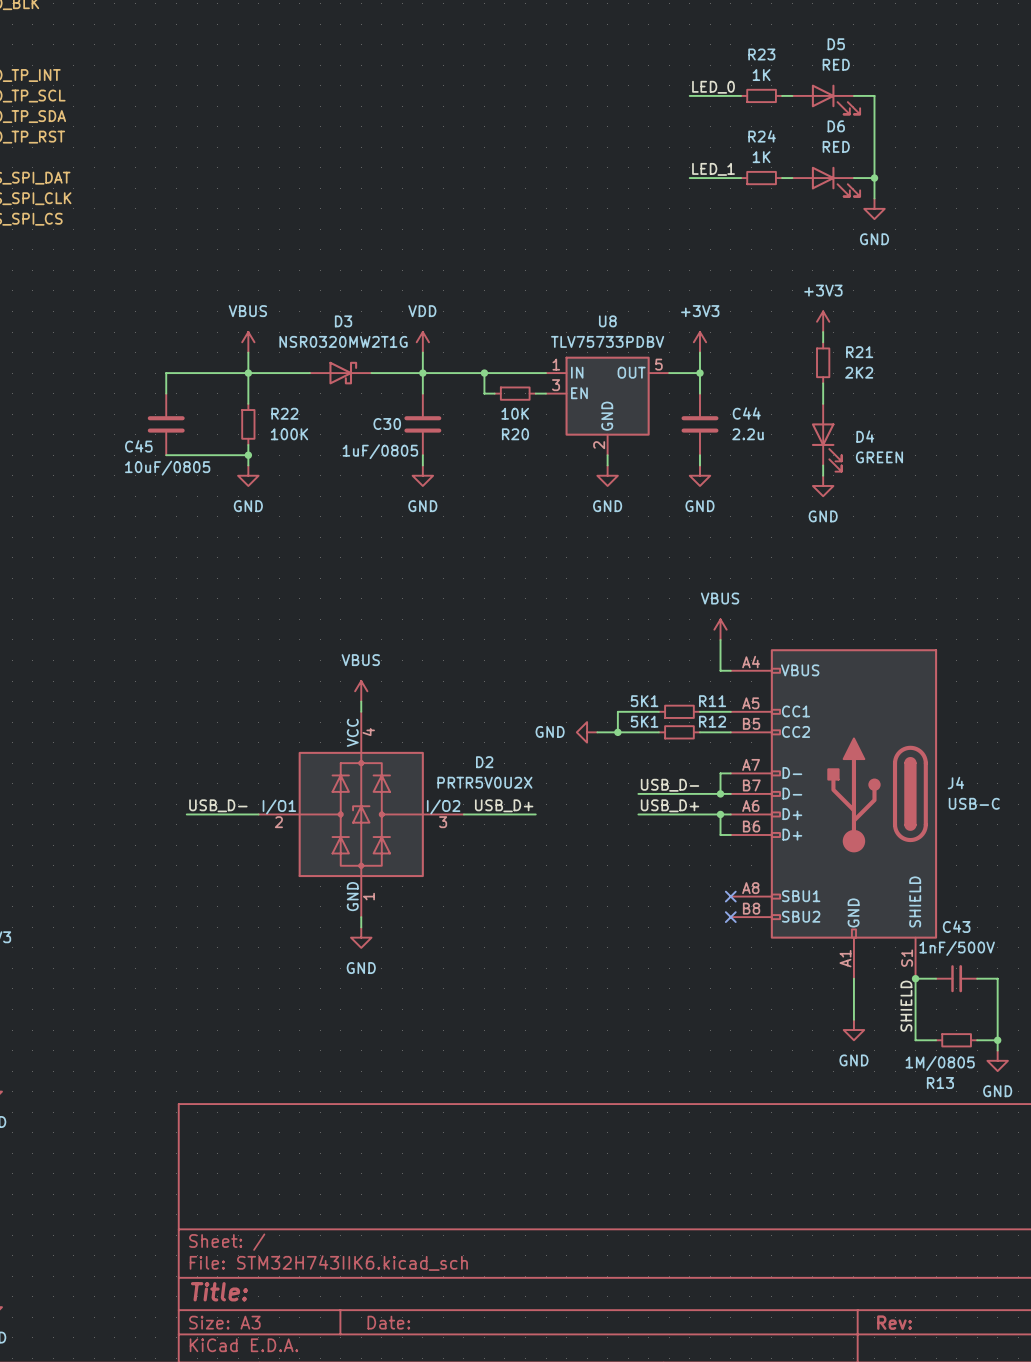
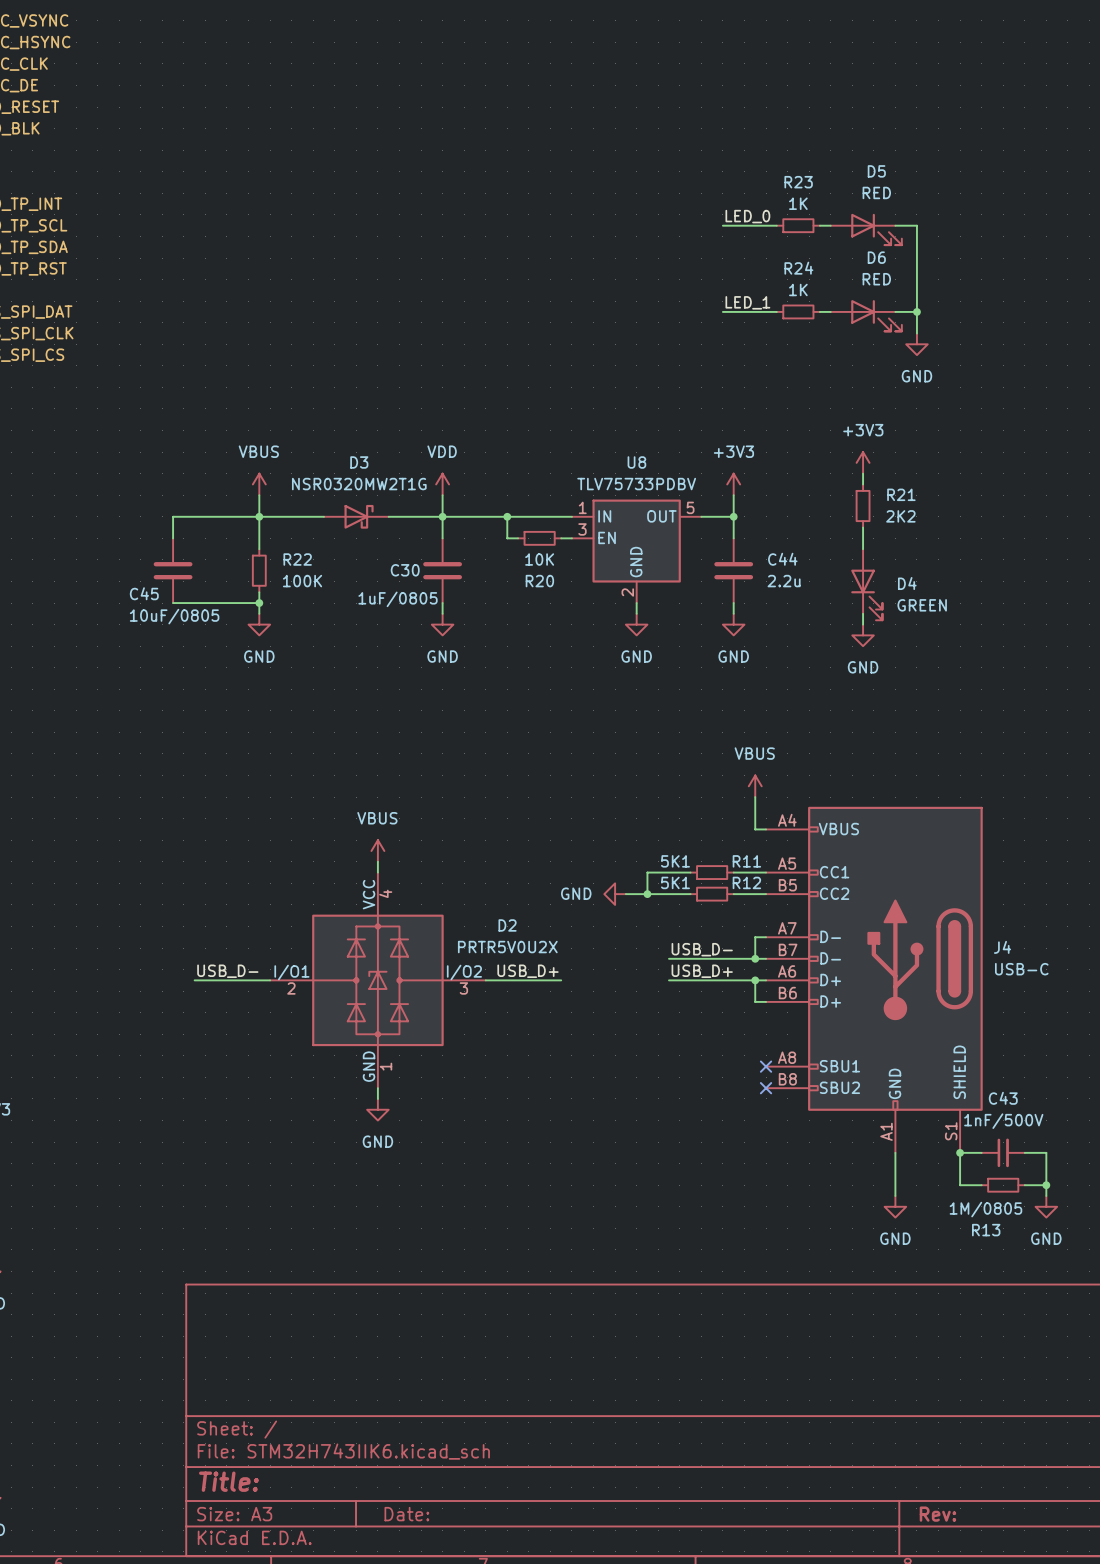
label: SHIELD (906, 1006) -> none
wire: (915, 1009) (915, 1040) (936, 1040) -> (960, 1185) (981, 1185)
wire: (997, 1019) (997, 1050) -> none
R13 position: (956, 1040) -> (1003, 1185)
wire: (977, 1040) (997, 1040) -> (1024, 1185) (1046, 1185)
junction position: (997, 1040) -> (1046, 1185)
power symbol position: GND (997, 1060) -> GND (1046, 1206)

